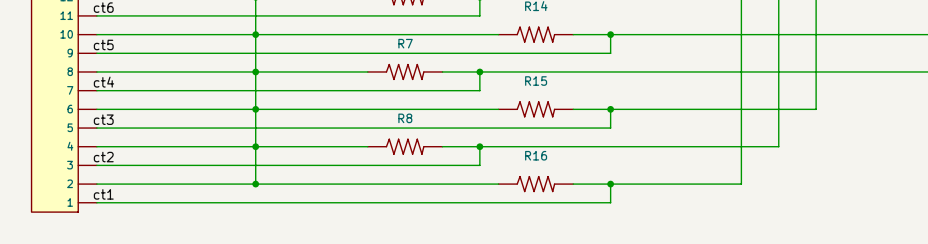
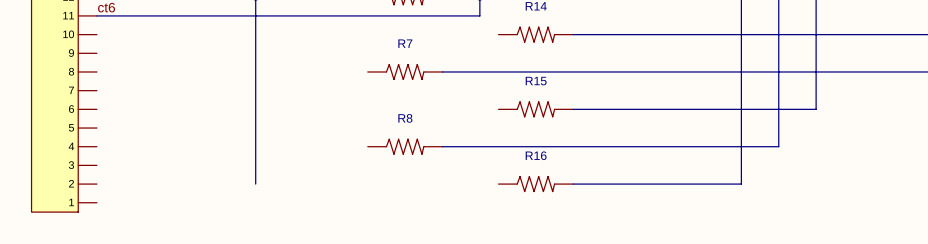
wire: (96, 34) (498, 34) -> none
junction: (255, 34) -> none
wire: (610, 34) (610, 53) (96, 53) -> none
junction: (610, 34) -> none
label: ct5 (103, 44) -> none
wire: (96, 71) (367, 71) -> none
junction: (255, 71) -> none
wire: (479, 71) (479, 90) (96, 90) -> none
junction: (479, 71) -> none
label: ct4 (103, 82) -> none
wire: (96, 109) (498, 109) -> none
junction: (255, 109) -> none
wire: (610, 109) (610, 128) (96, 128) -> none
junction: (610, 109) -> none
label: ct3 (103, 119) -> none
wire: (96, 146) (367, 146) -> none
junction: (255, 146) -> none
wire: (479, 146) (479, 165) (96, 165) -> none
junction: (479, 146) -> none
label: ct2 (103, 157) -> none
wire: (96, 184) (498, 184) -> none
junction: (255, 184) -> none
wire: (610, 184) (610, 202) (96, 202) -> none
junction: (610, 184) -> none
label: ct1 (103, 194) -> none

